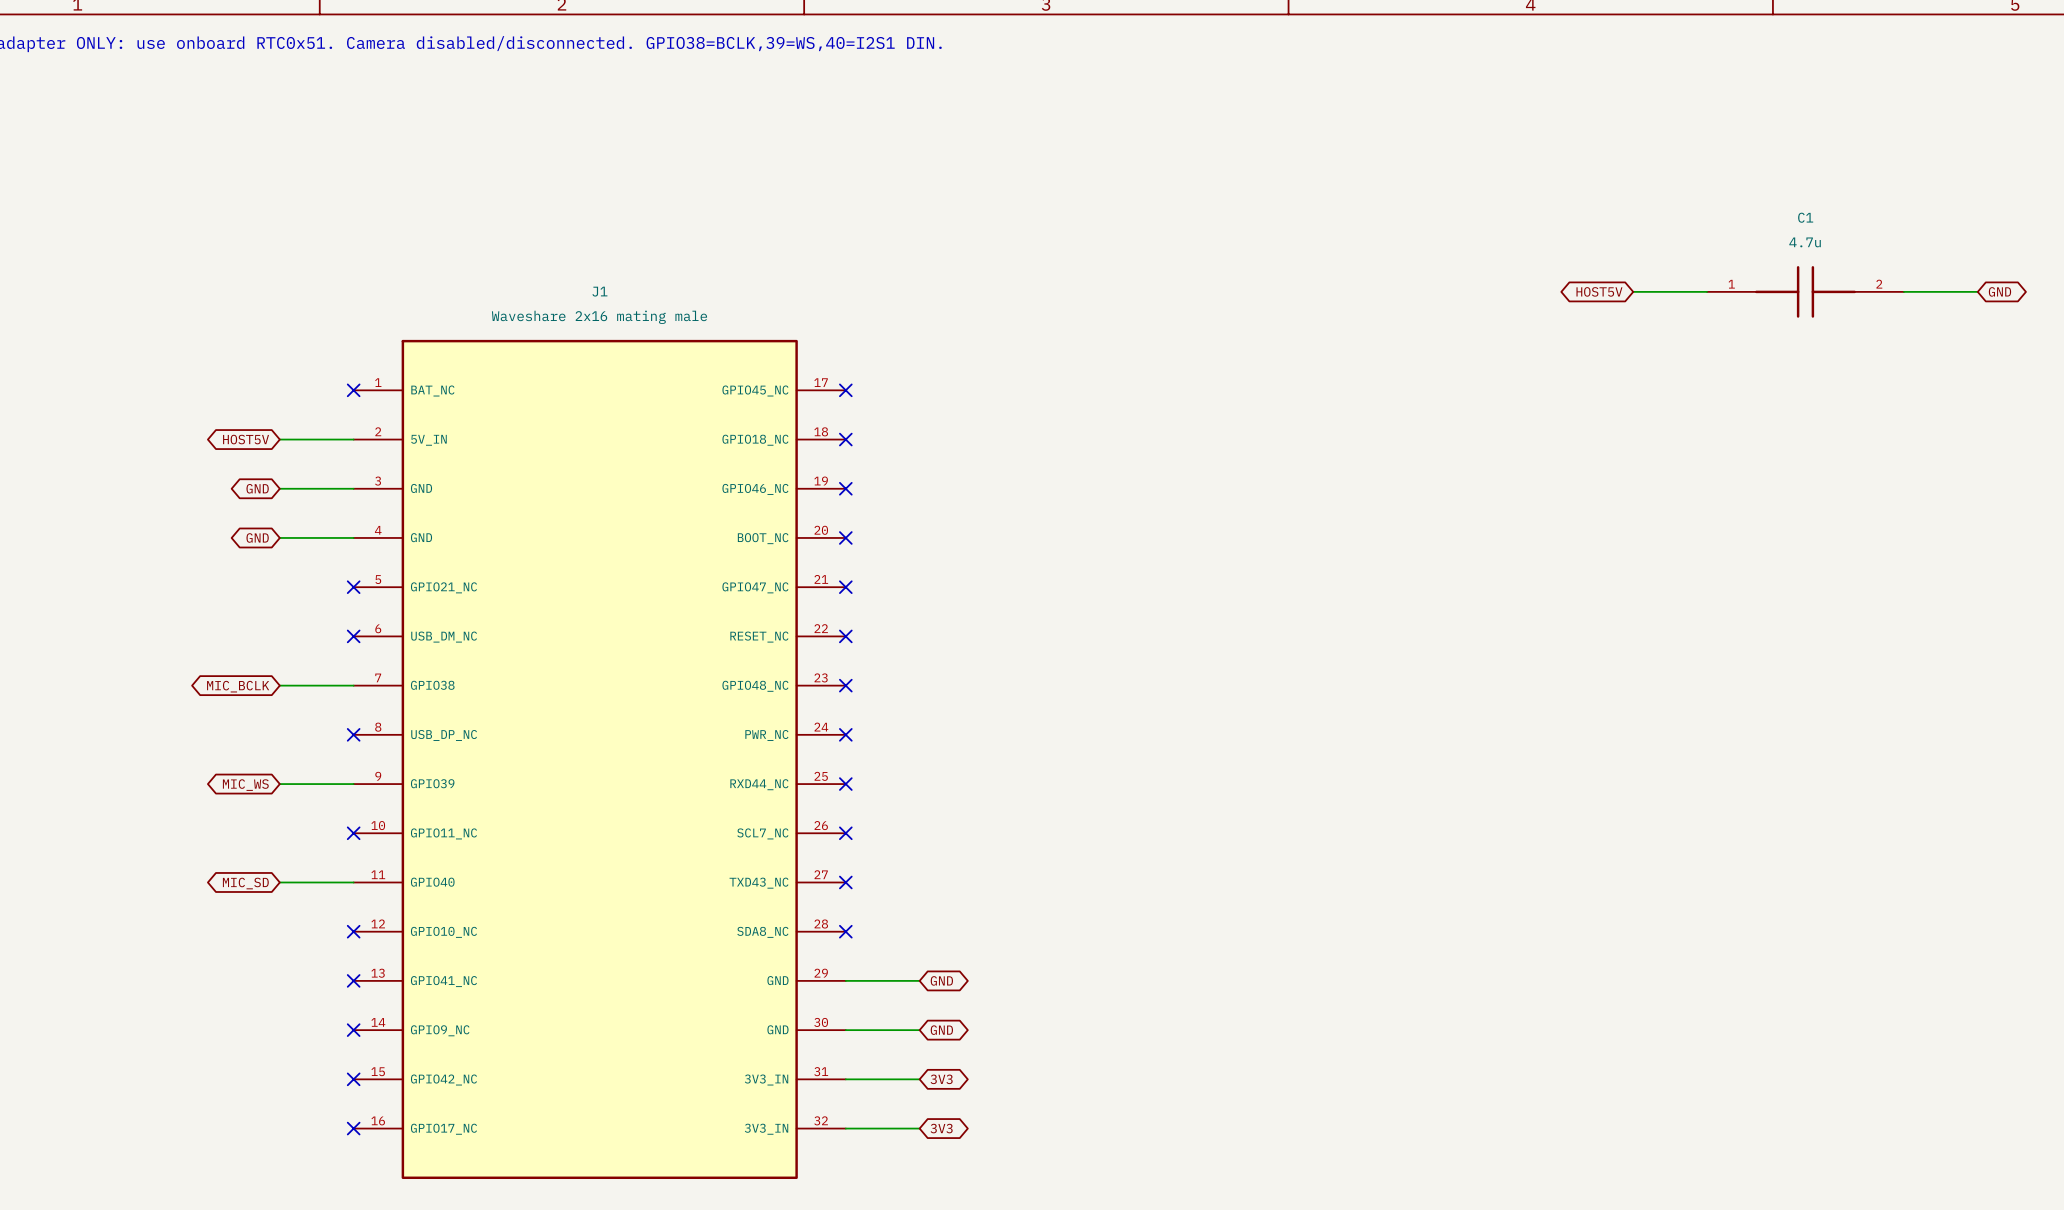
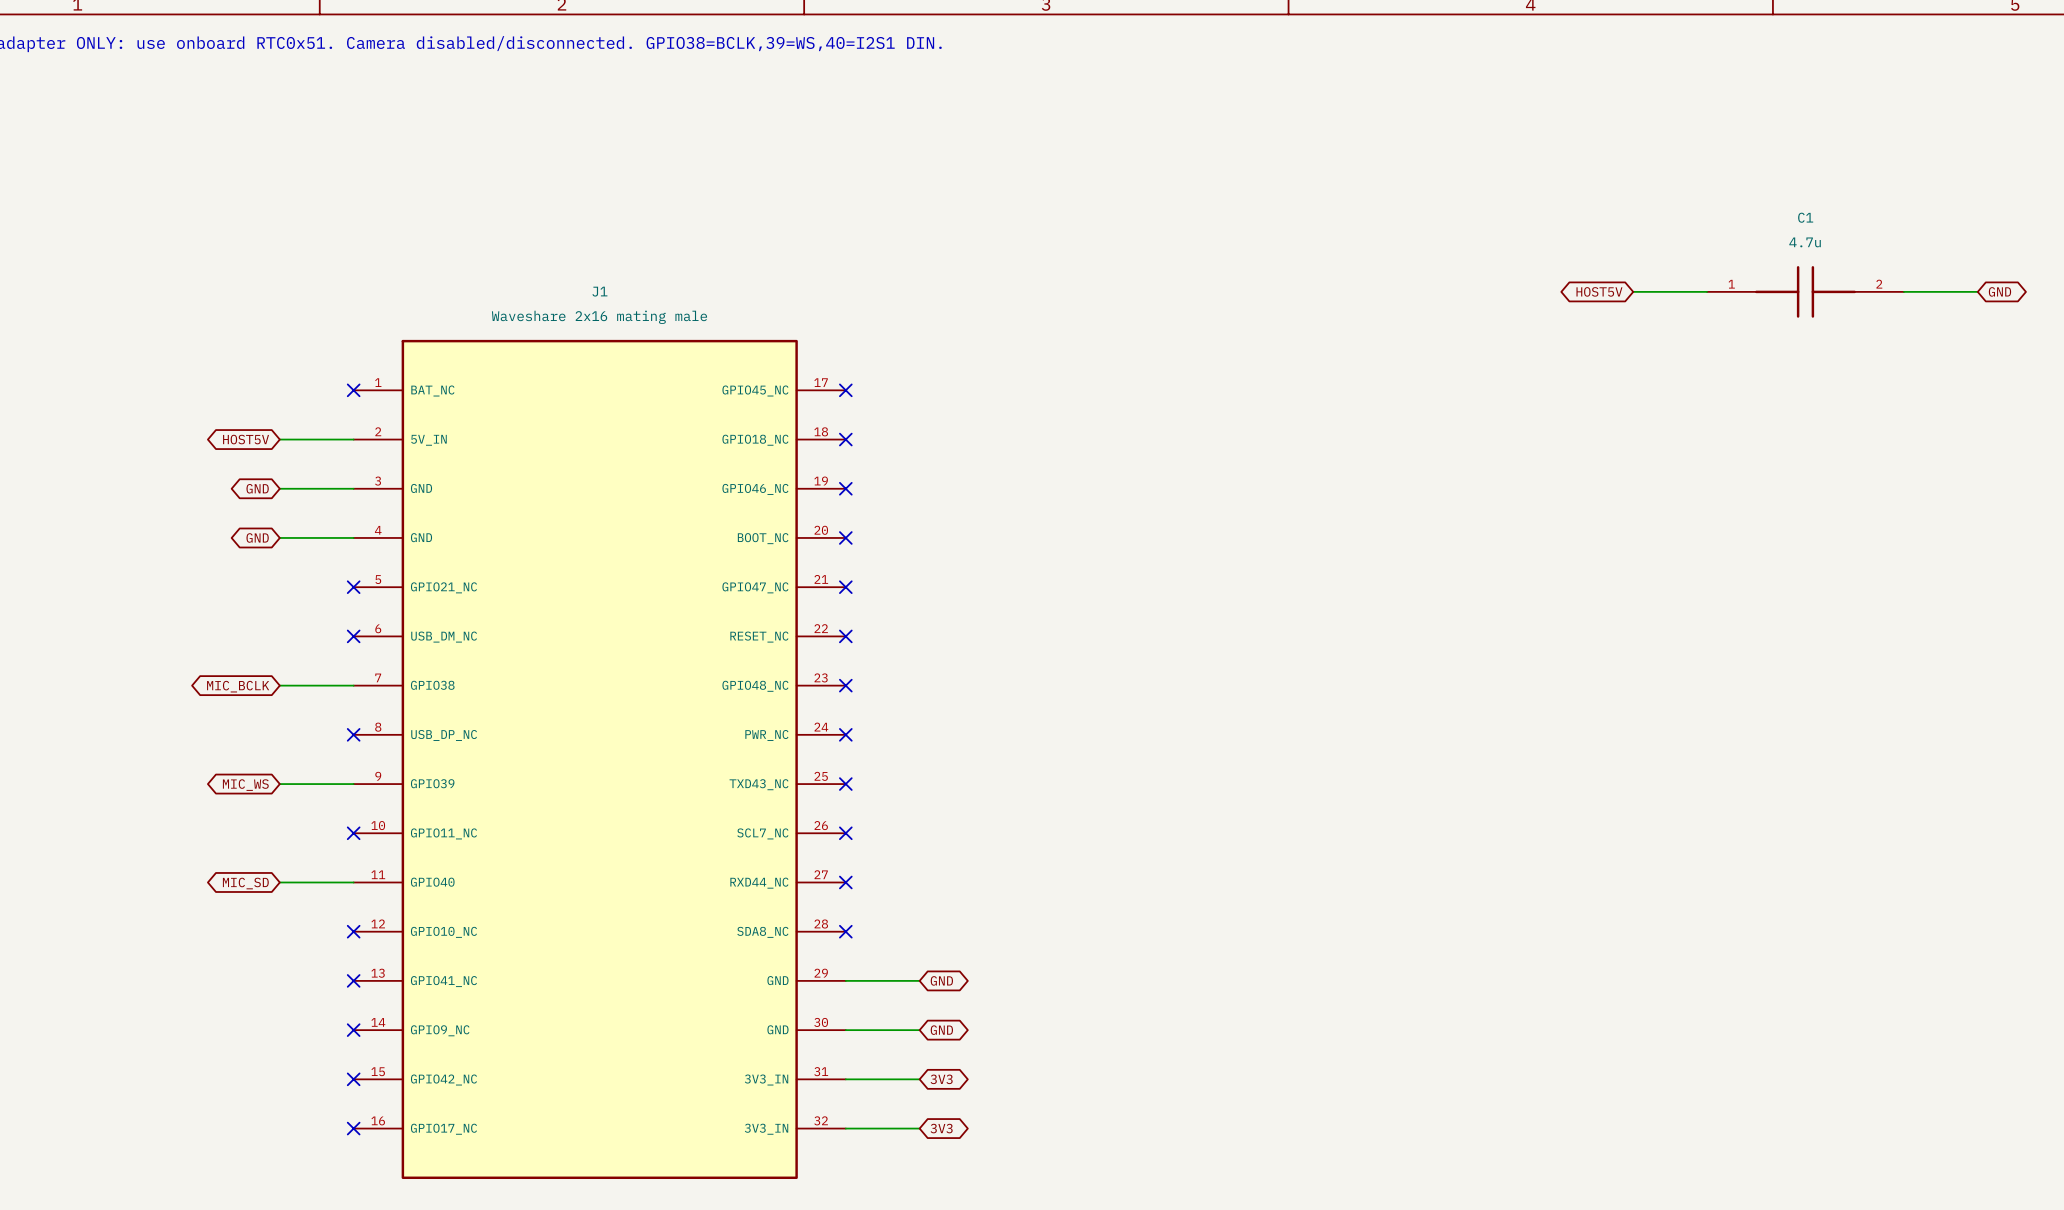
J1 pin name: RXD44_NC (759, 784) -> TXD43_NC (759, 784)
J1 pin name: TXD43_NC (759, 883) -> RXD44_NC (759, 883)

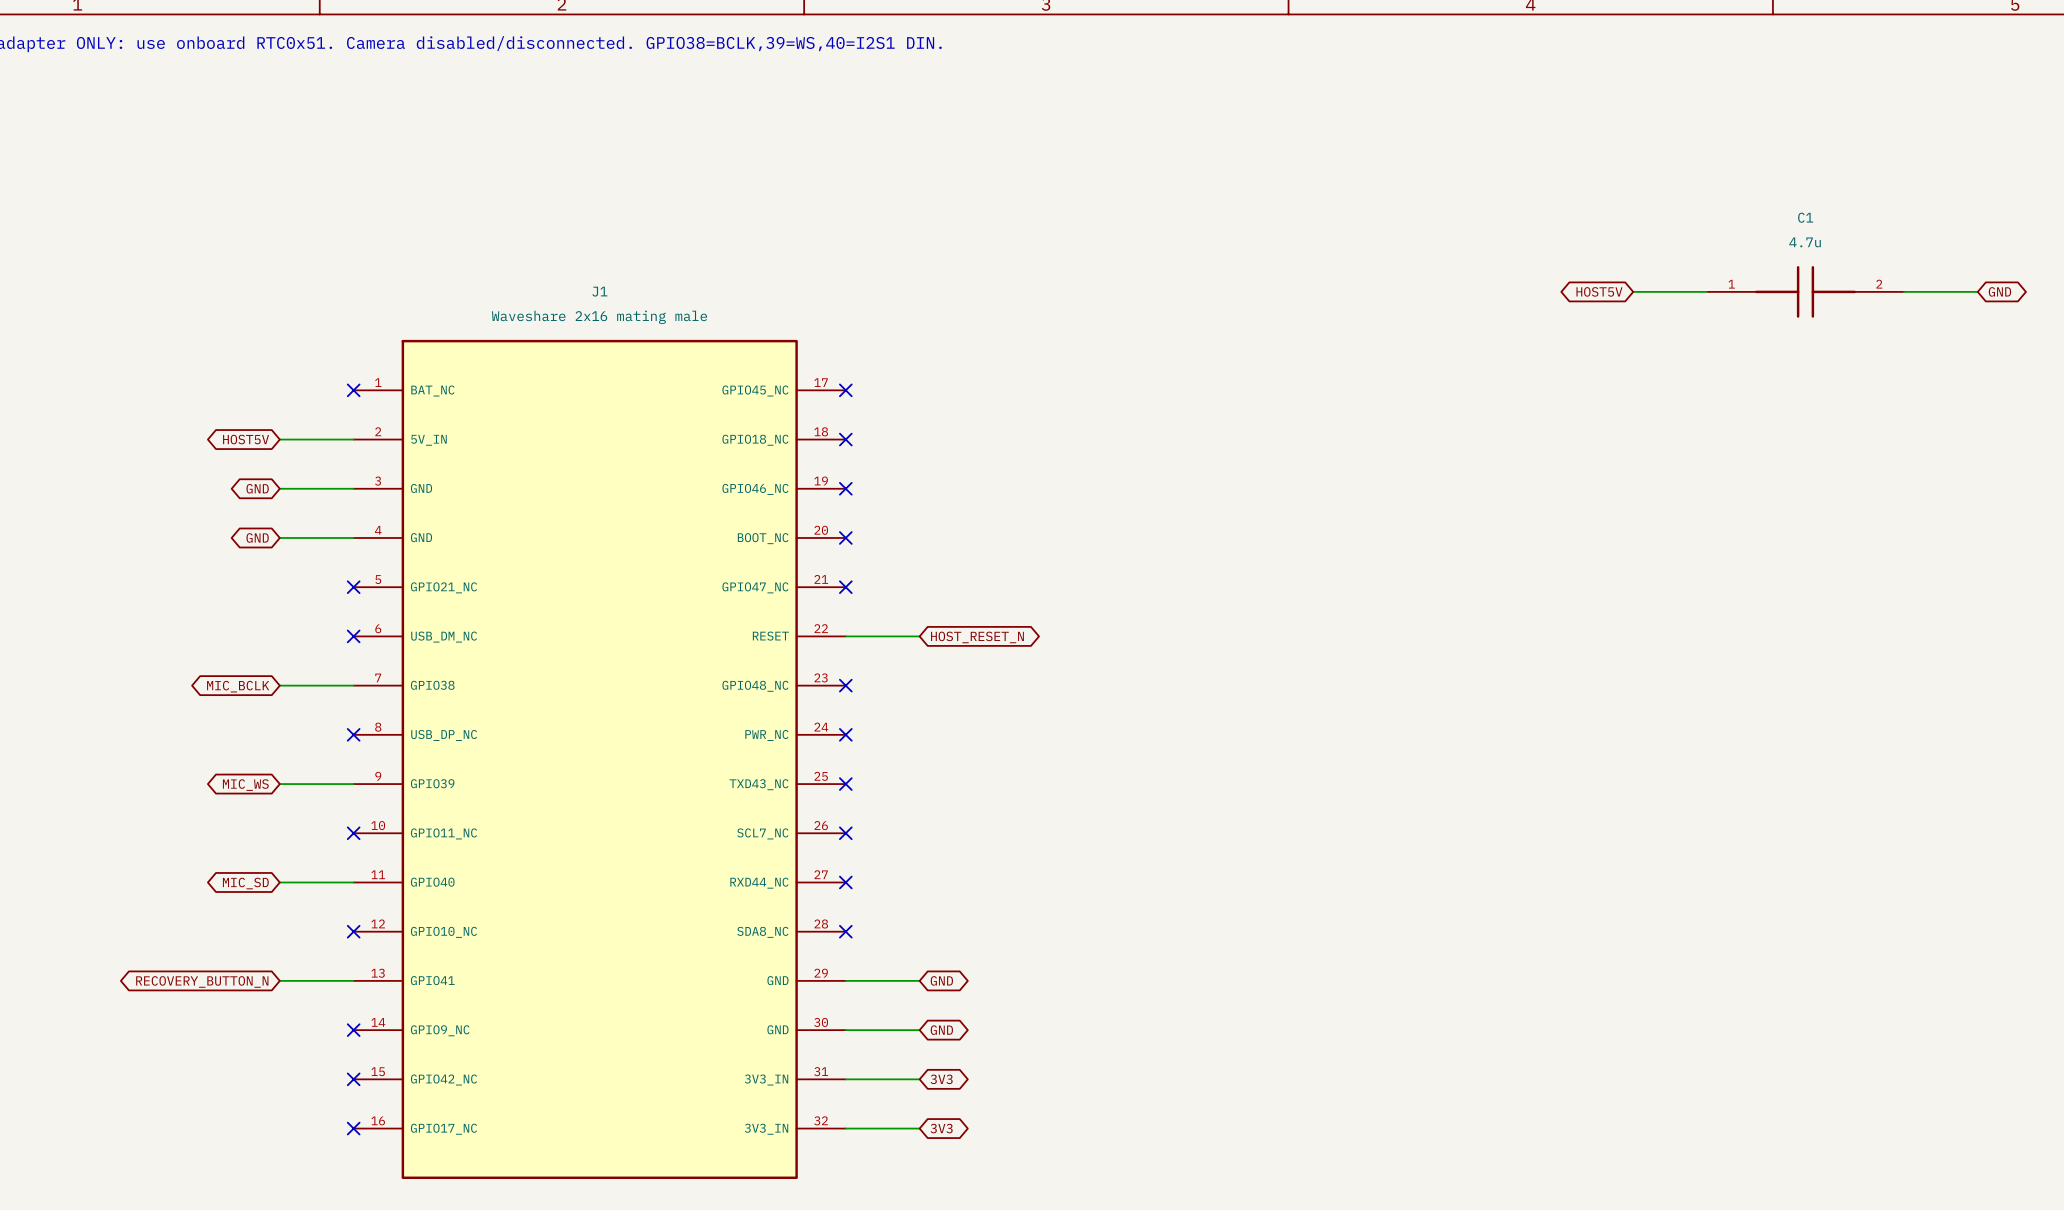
wire: none -> (845, 636) (919, 636)
no-connect mark: (845, 636) -> none
J1 pin name: RESET_NC (759, 637) -> RESET (770, 636)
global label: none -> HOST_RESET_N (977, 637)
wire: none -> (279, 980) (353, 980)
no-connect mark: (353, 980) -> none
global label: none -> RECOVERY_BUTTON_N (202, 981)
J1 pin name: GPIO41_NC (443, 981) -> GPIO41 (432, 980)

